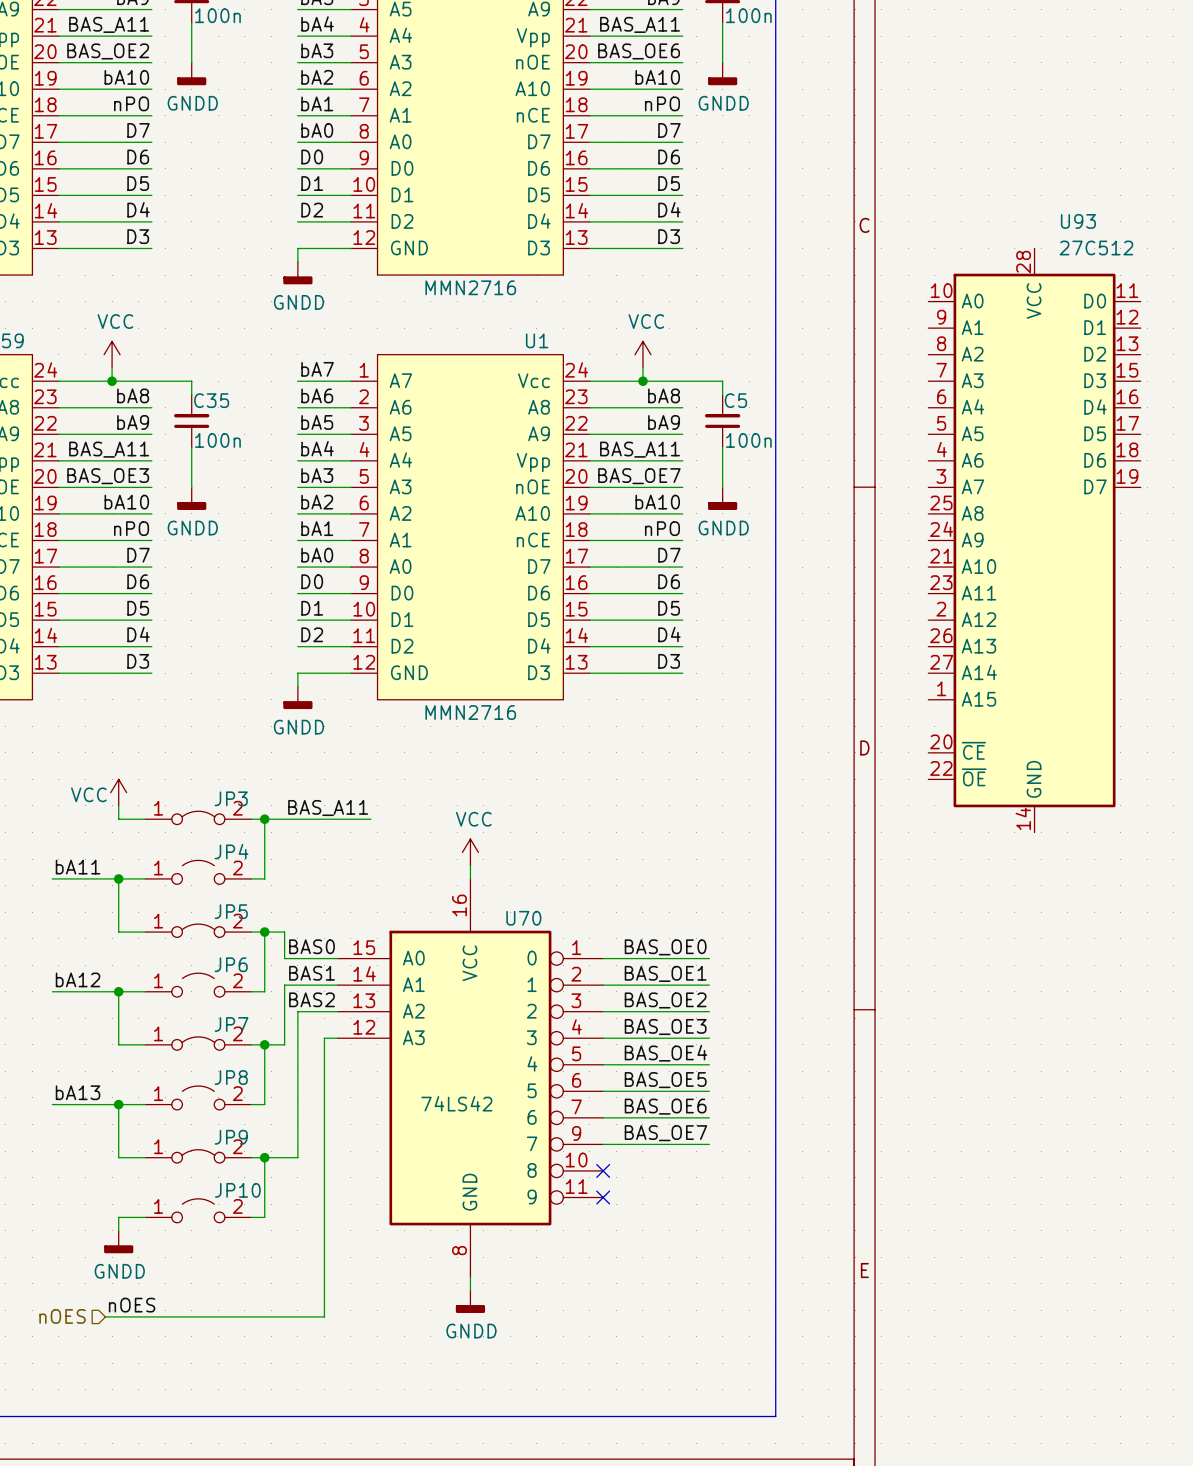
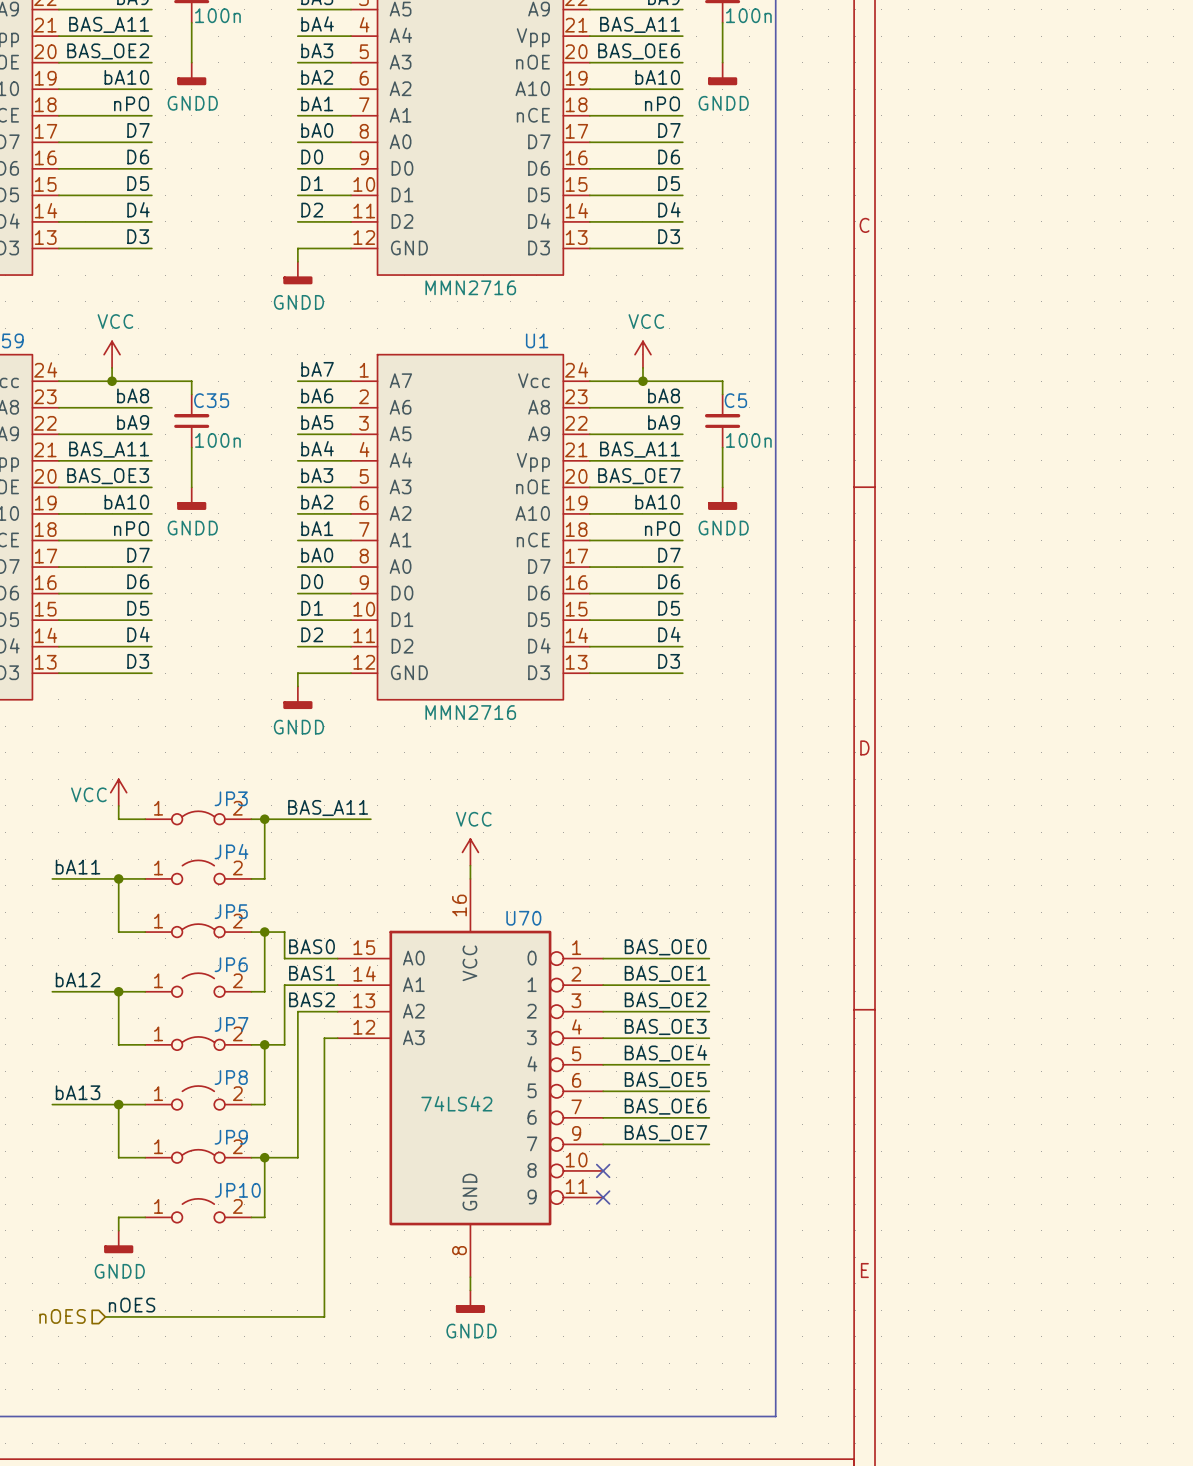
U93: 27C512 (1034, 540) -> none

